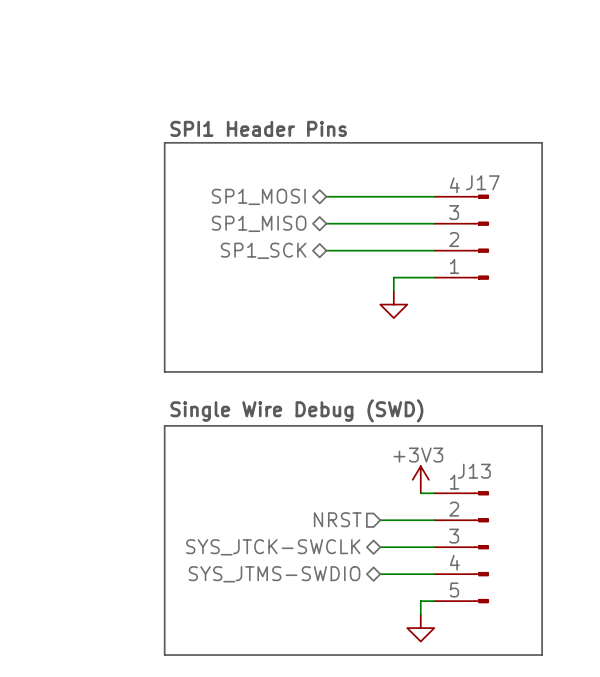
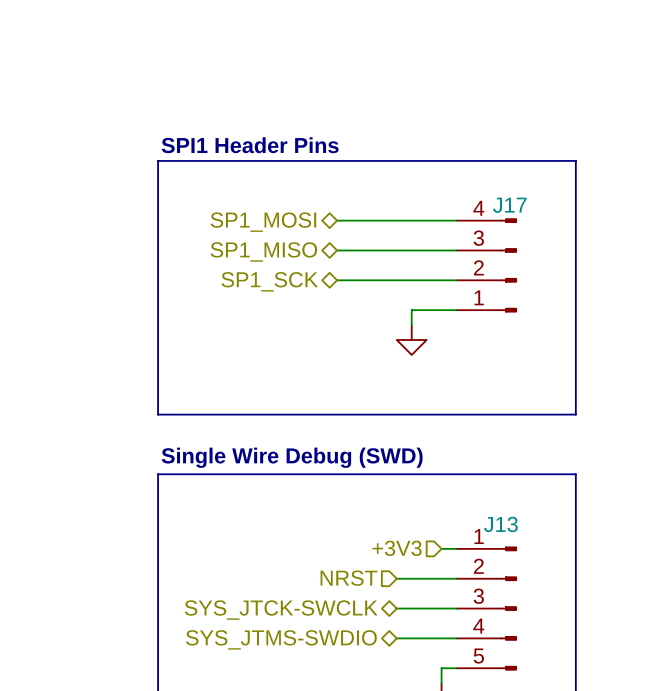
power symbol: +3V3 (420, 479) -> none
hierarchical label: none -> +3V3 (397, 548)

